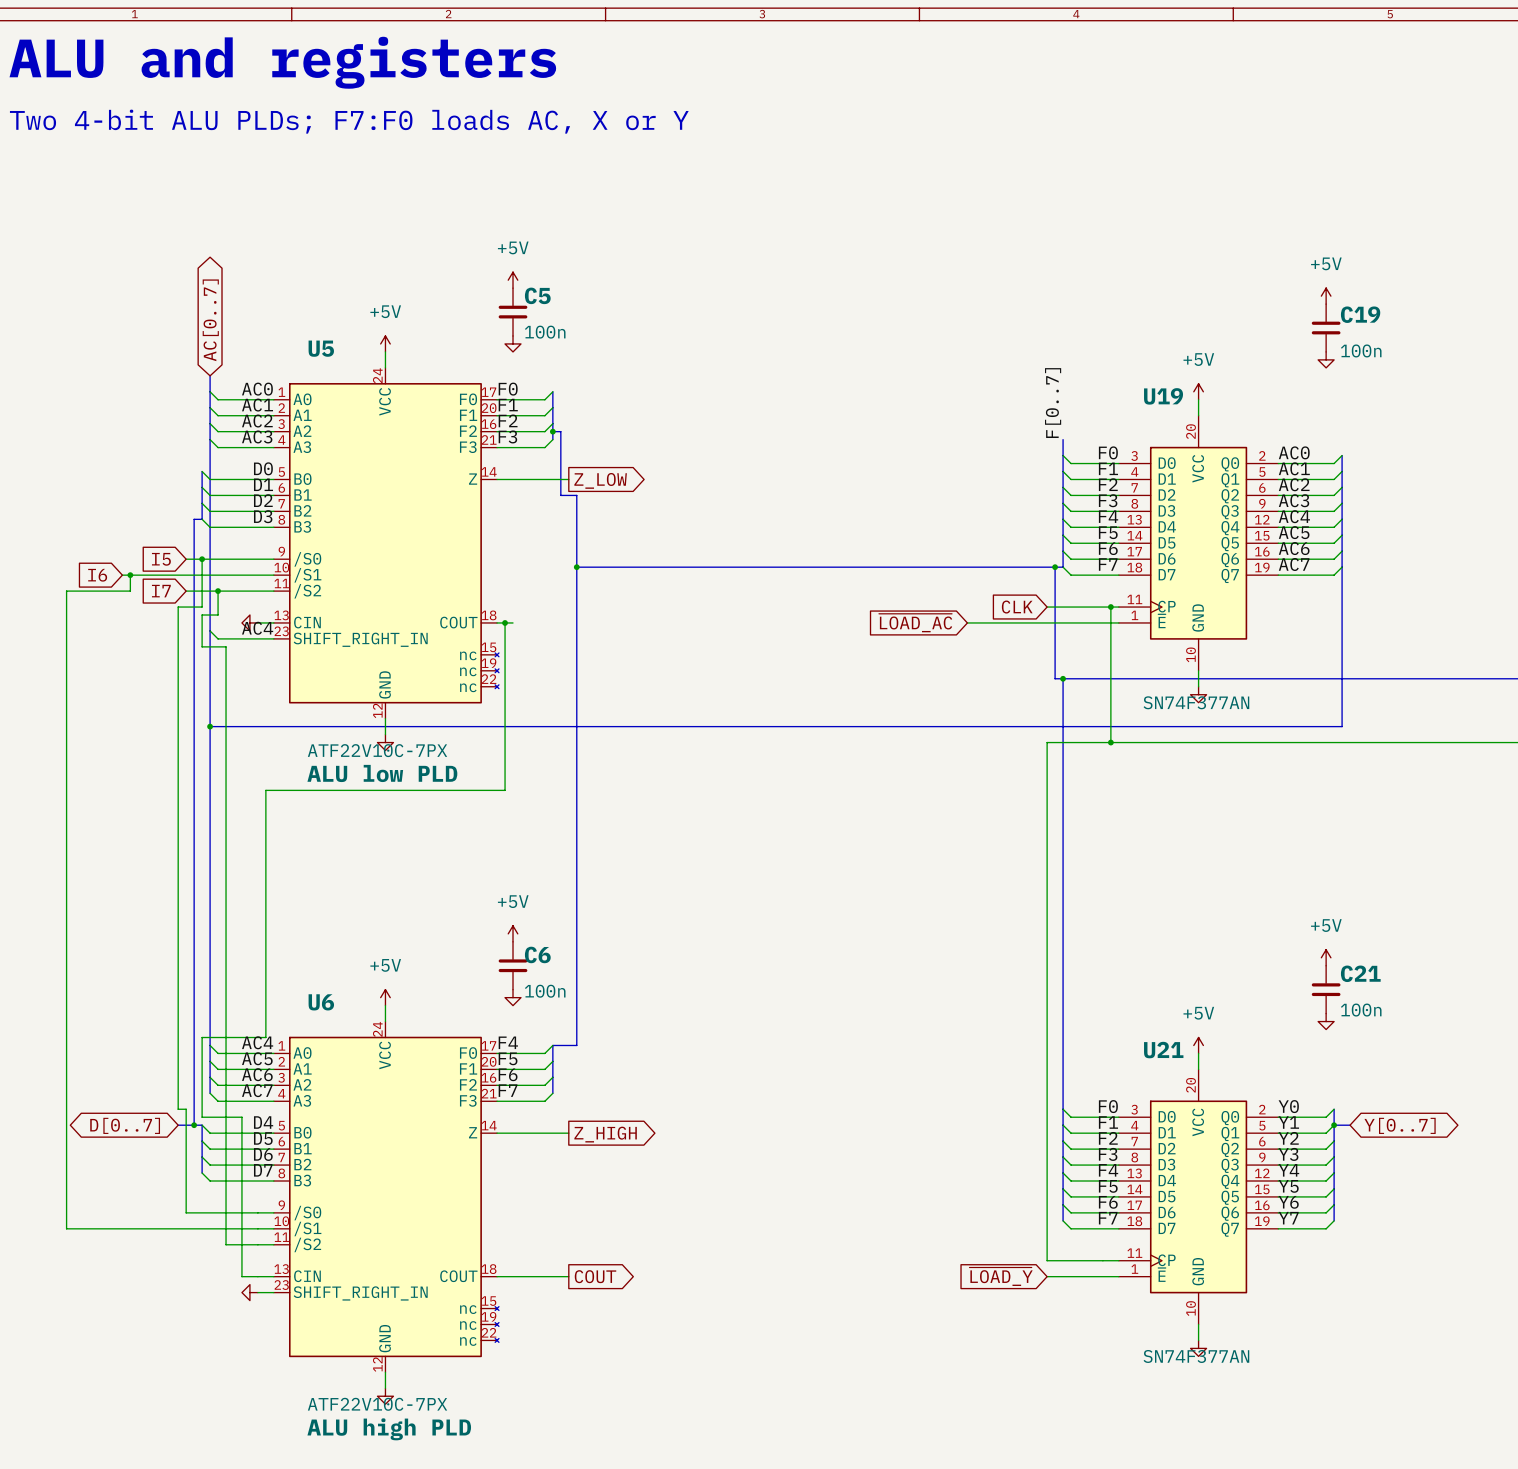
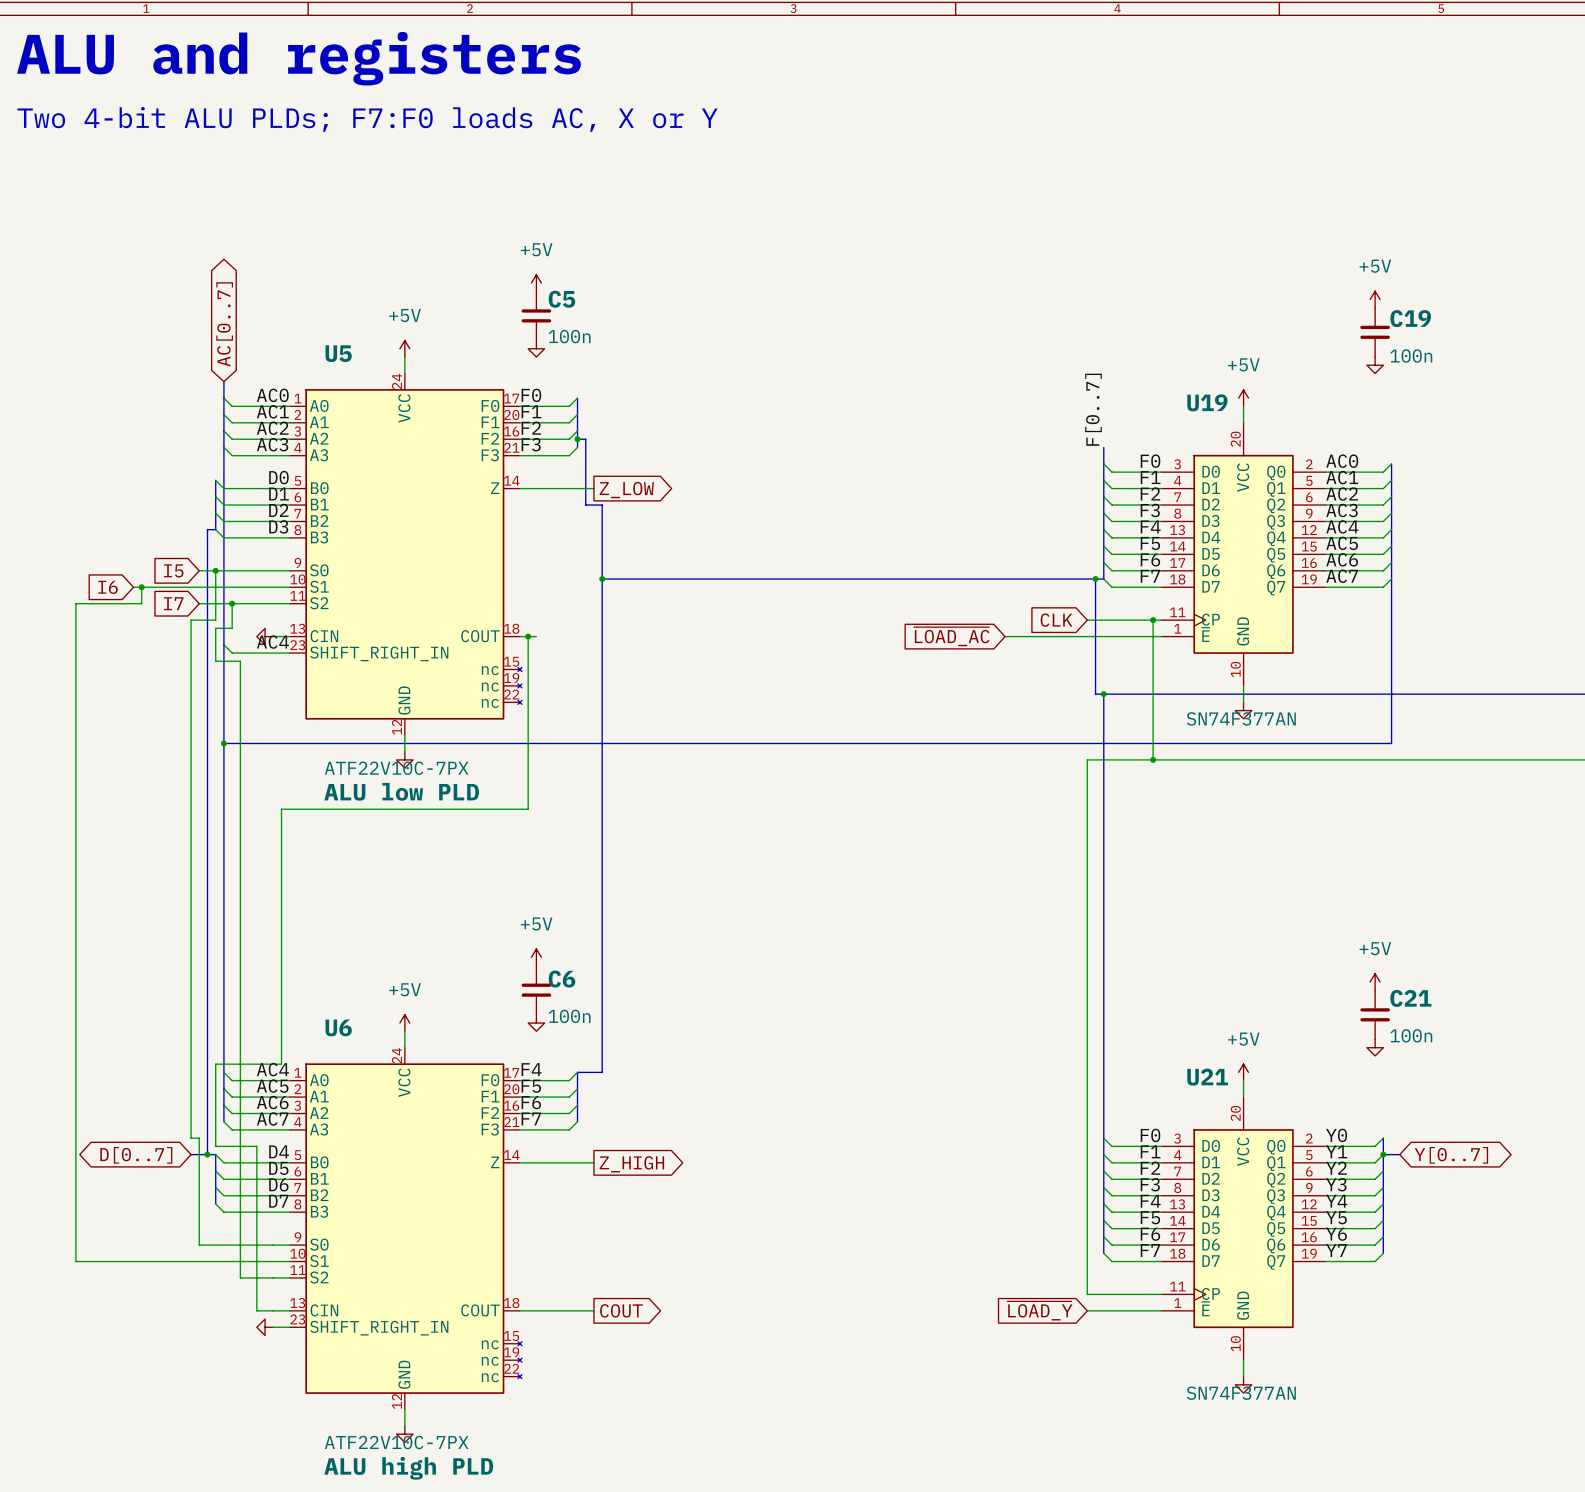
U5 pin name: /S0 (307, 559) -> S0 (319, 570)
U5 pin name: /S1 (307, 575) -> S1 (319, 586)
U5 pin name: /S2 (307, 591) -> S2 (319, 603)
U6 pin name: /S0 (307, 1213) -> S0 (319, 1244)
U6 pin name: /S1 (307, 1229) -> S1 (319, 1261)
U6 pin name: /S2 (307, 1244) -> S2 (319, 1277)

